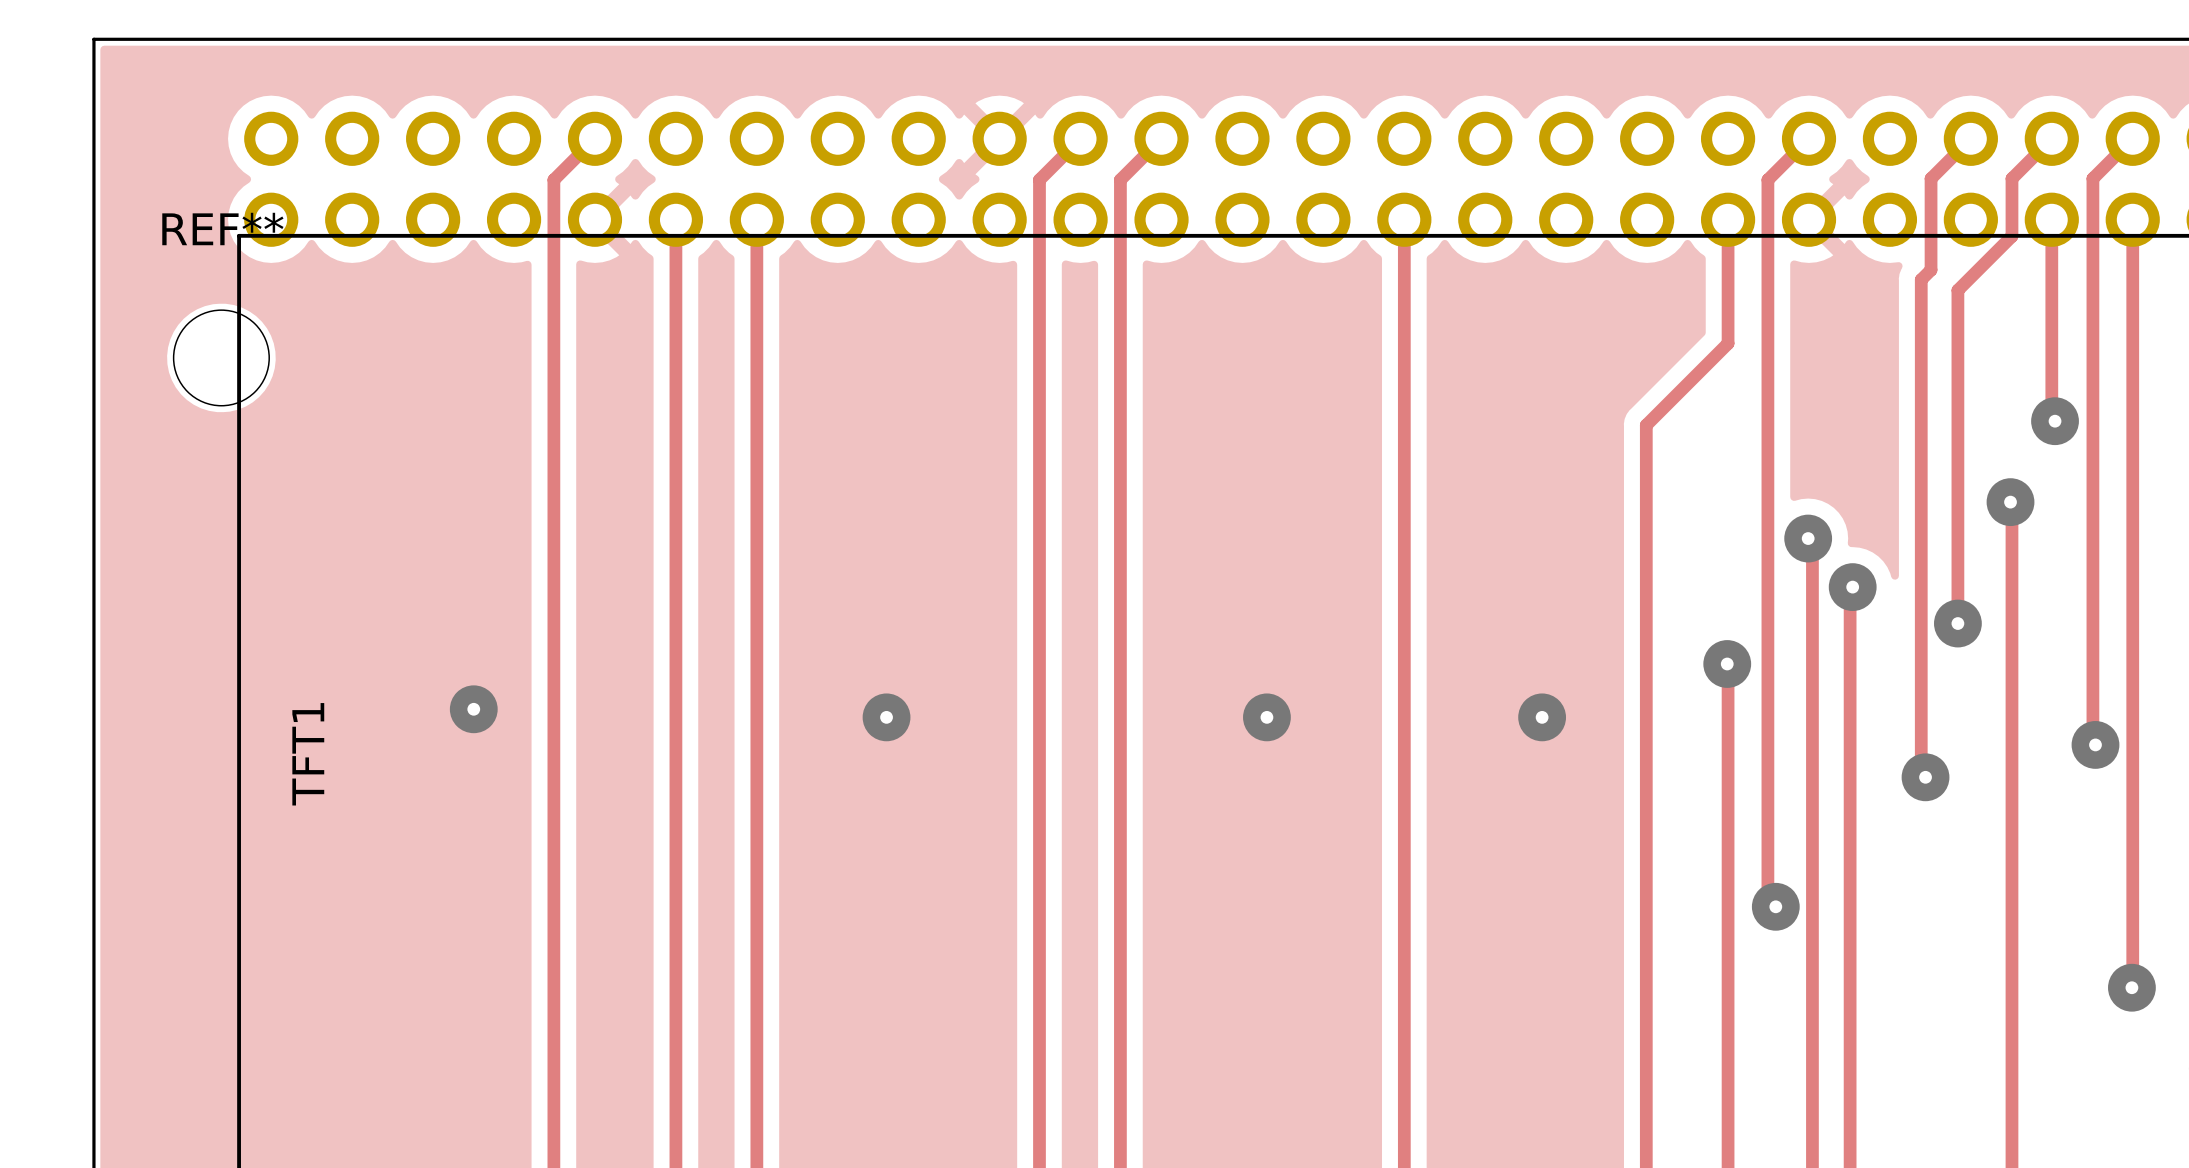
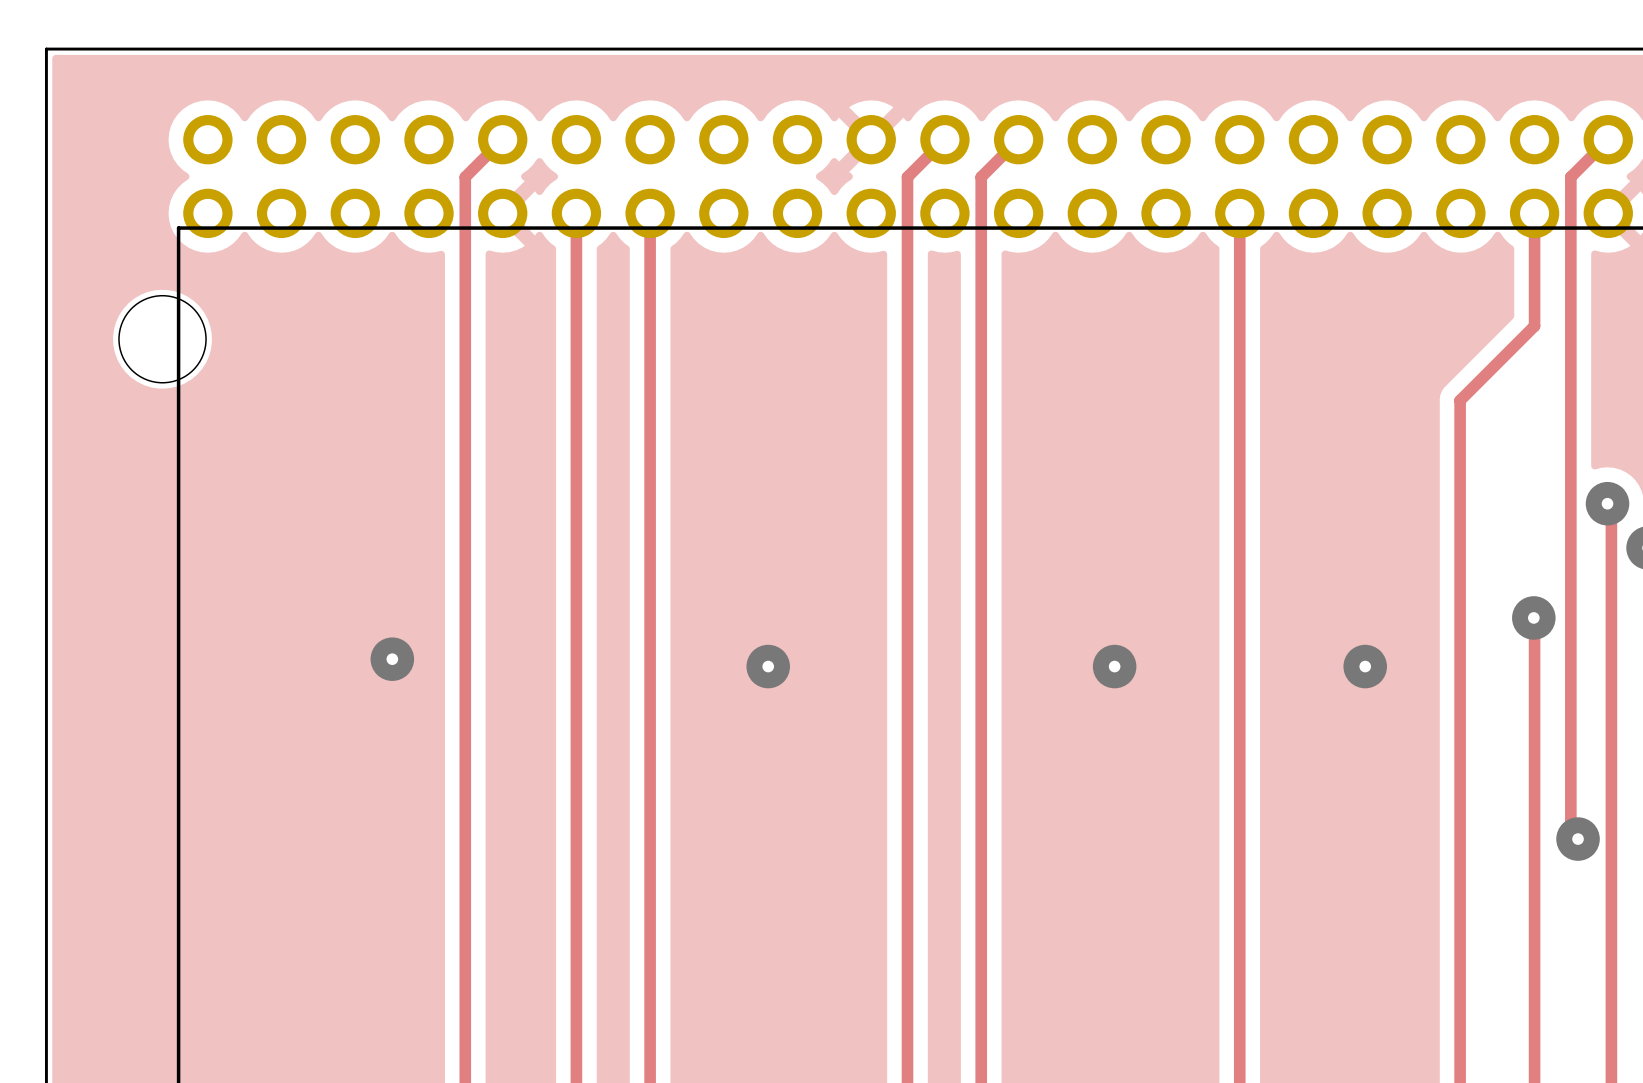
REF** name: REF** (222, 229) -> none
TFT1 name: TFT1 (308, 754) -> none

